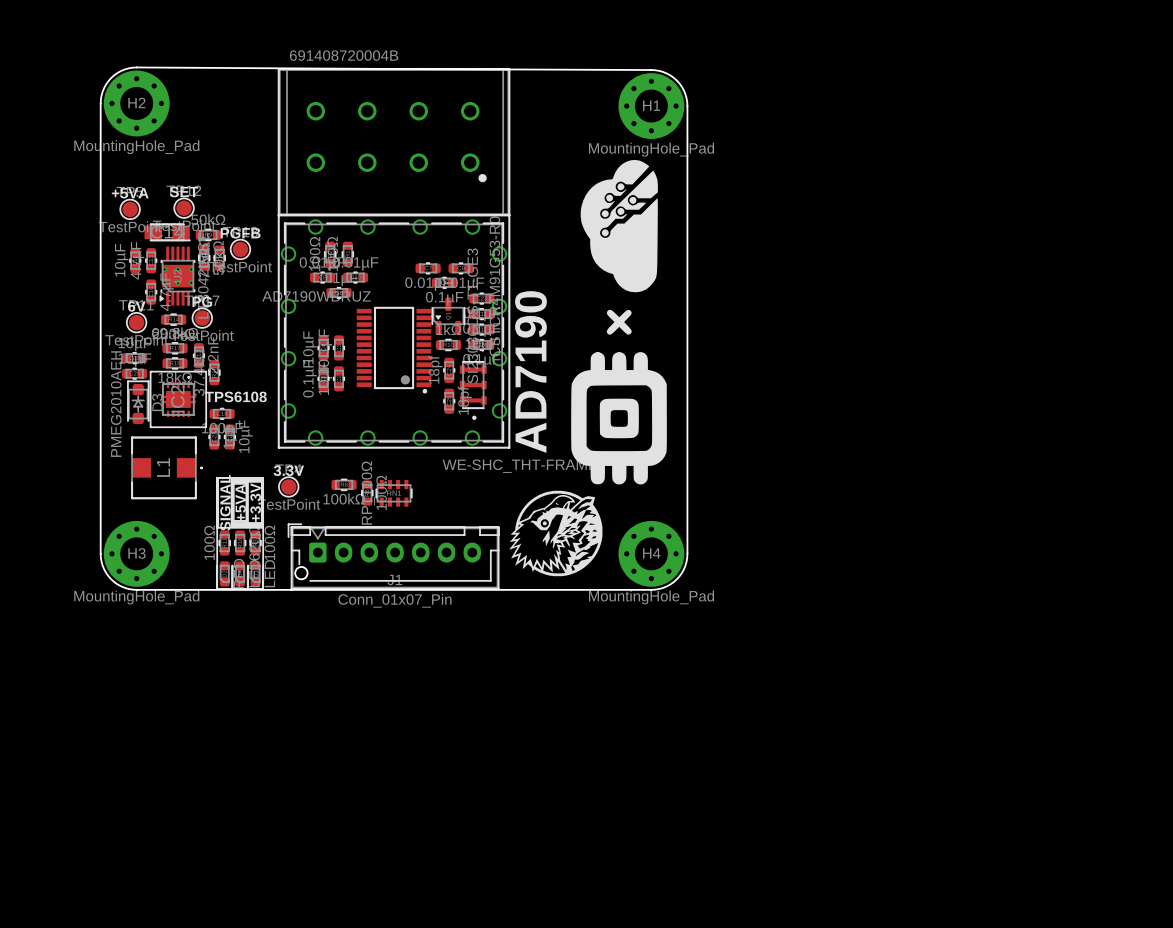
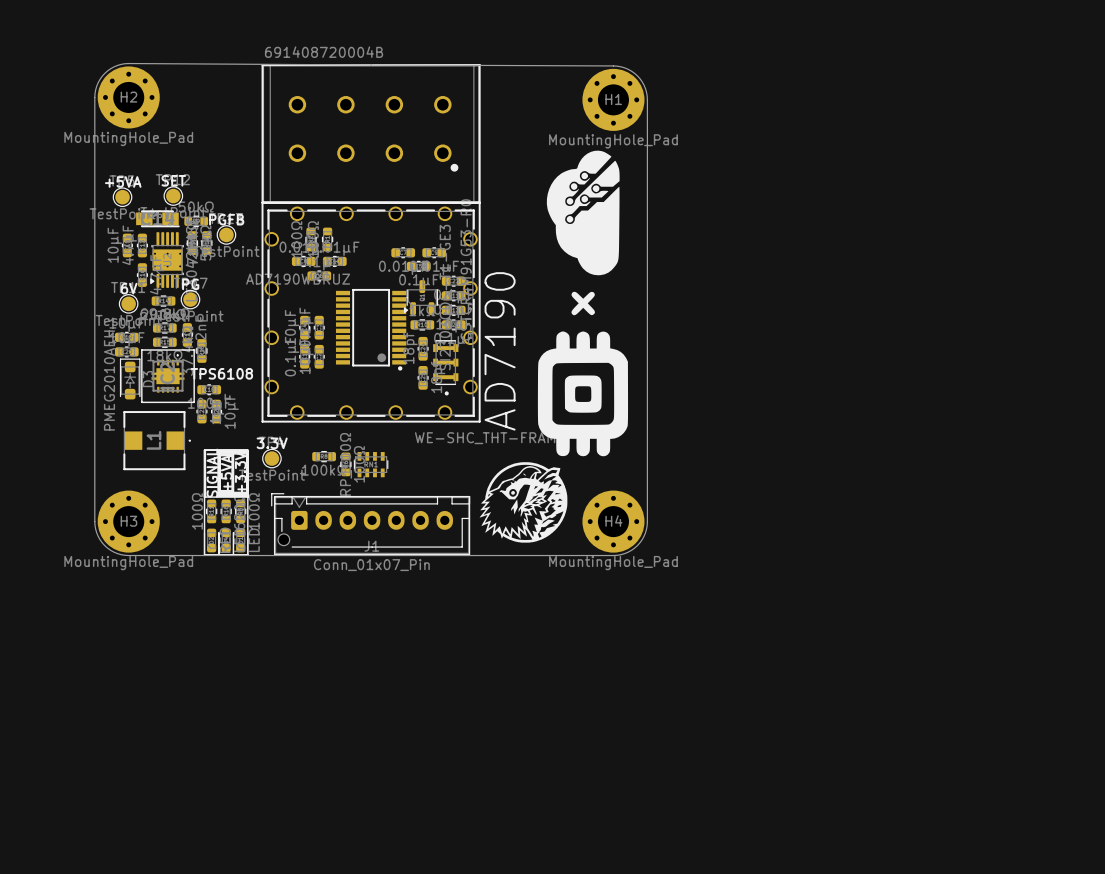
part footprint: [431, 297, 466, 335] -> [403, 280, 439, 316]

